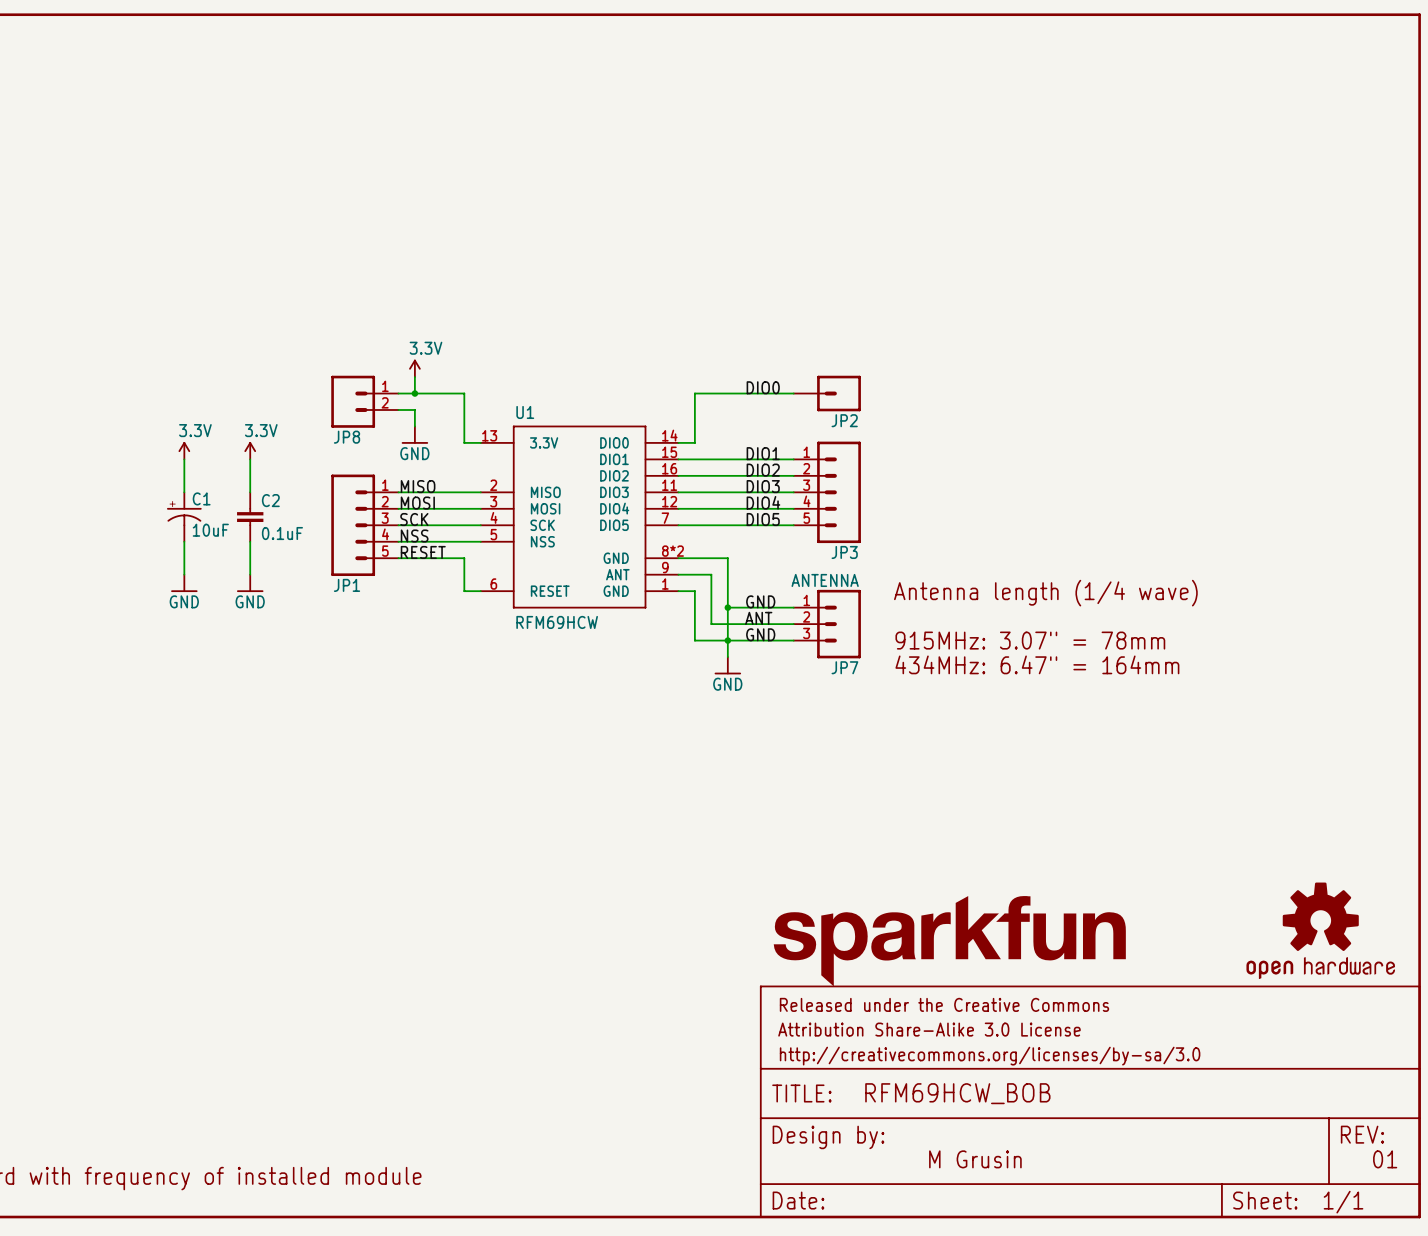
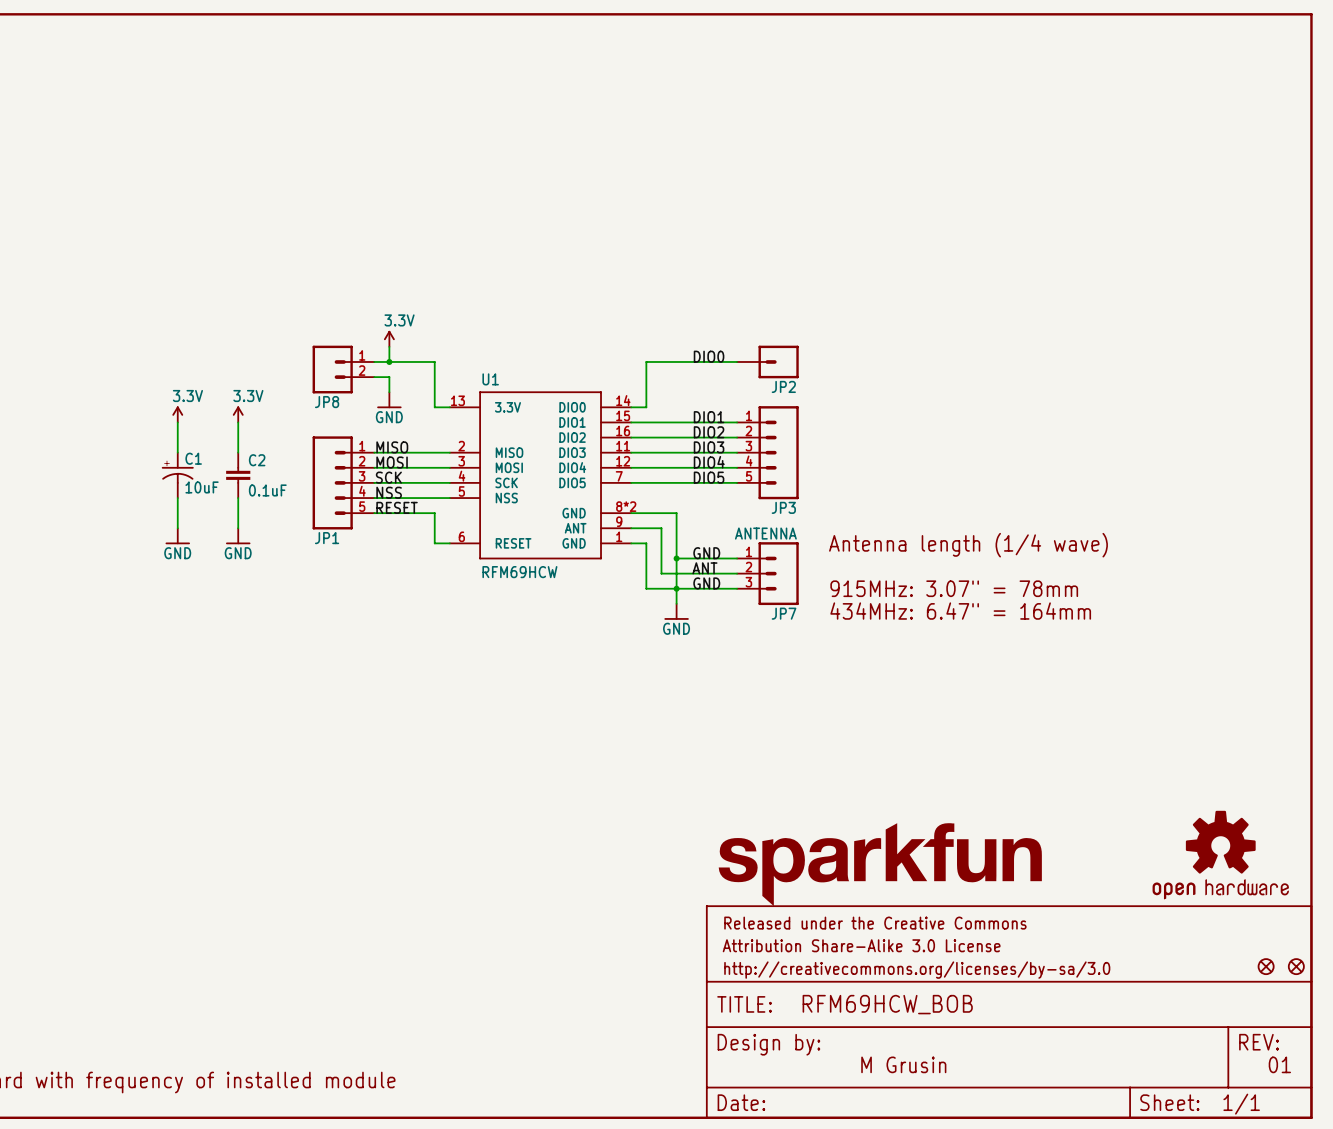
part: none -> (1266, 966)
part: none -> (1296, 966)

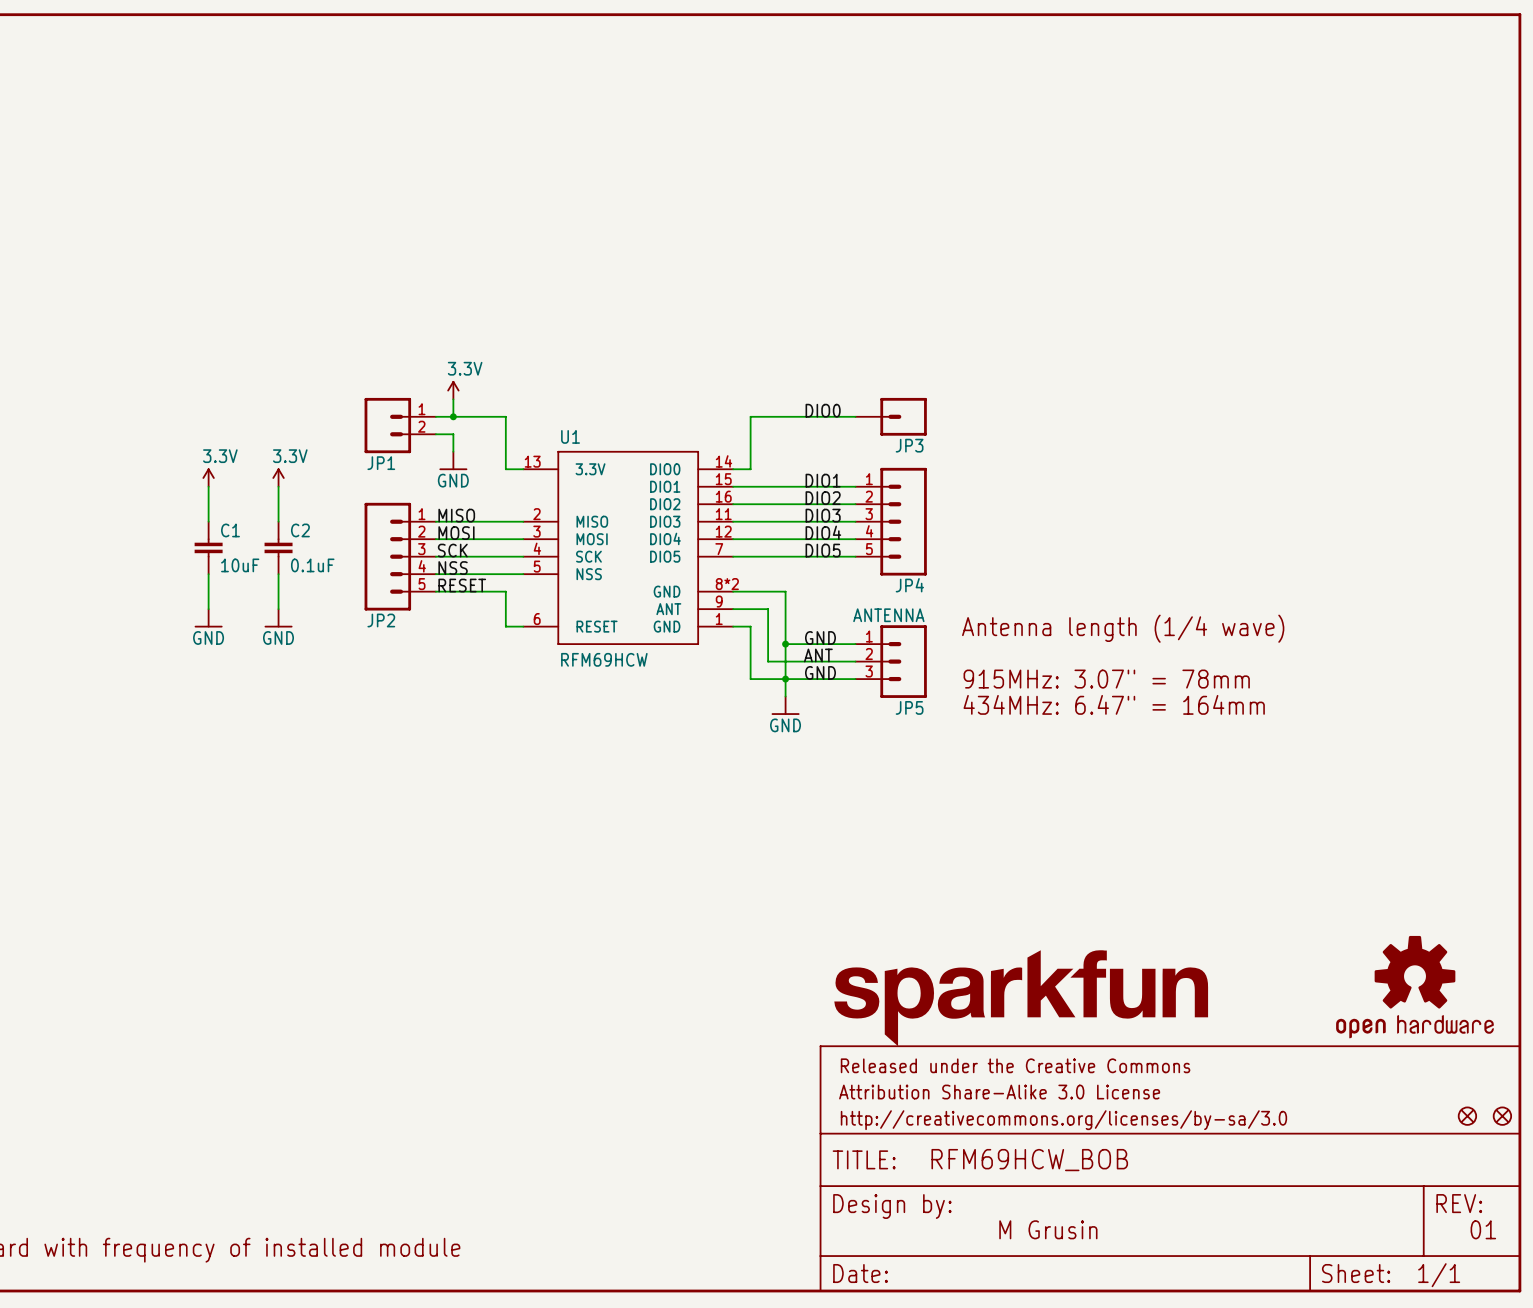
JP2 name: JP2 (783, 386) -> JP3 (909, 445)
JP8 name: JP8 (327, 402) -> JP1 (381, 463)
C1 symbol: [161, 452, 194, 499] -> [194, 521, 223, 575]
JP3 name: JP3 (783, 507) -> JP4 (909, 585)
JP1 name: JP1 (327, 538) -> JP2 (381, 620)
JP7 name: JP7 (784, 613) -> JP5 (909, 707)

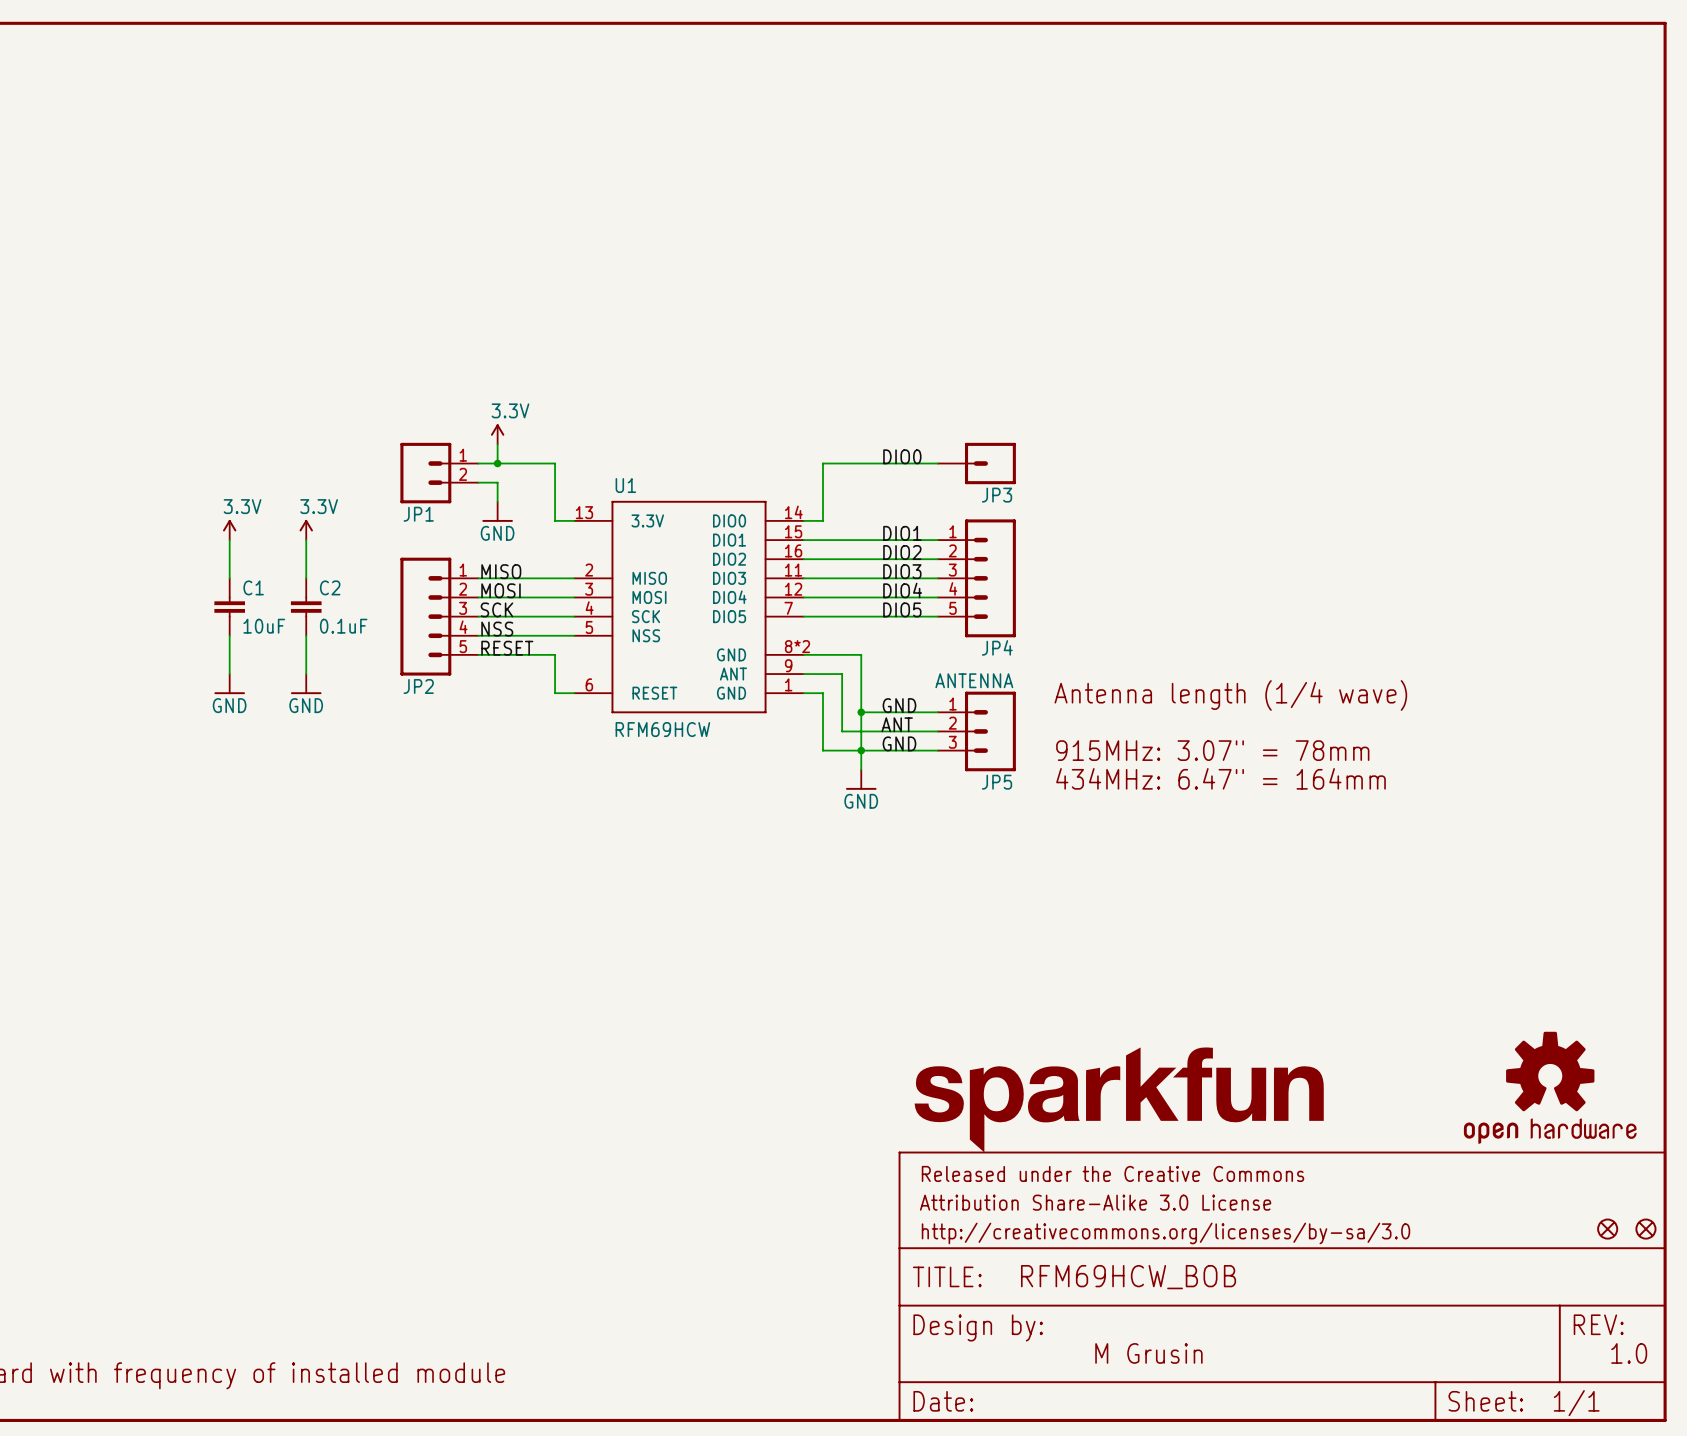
text: 01 (1483, 1229) -> 1.0 (1629, 1353)

